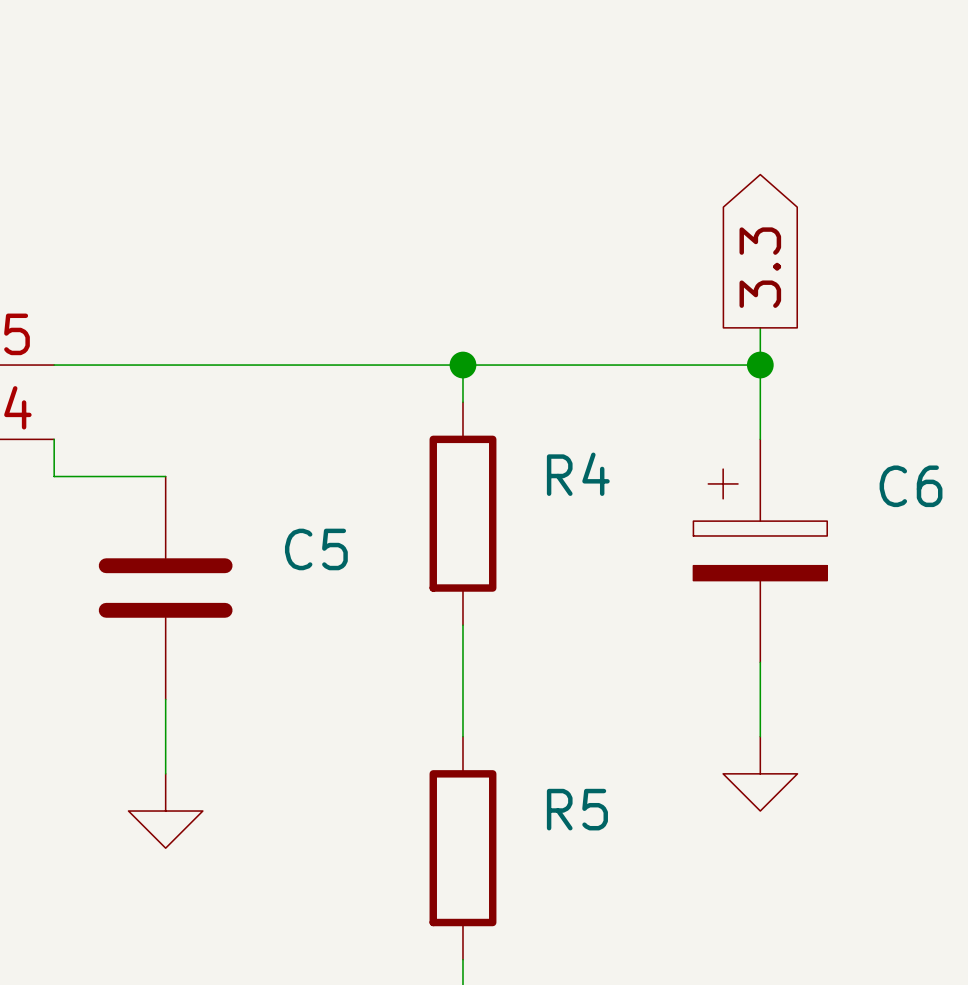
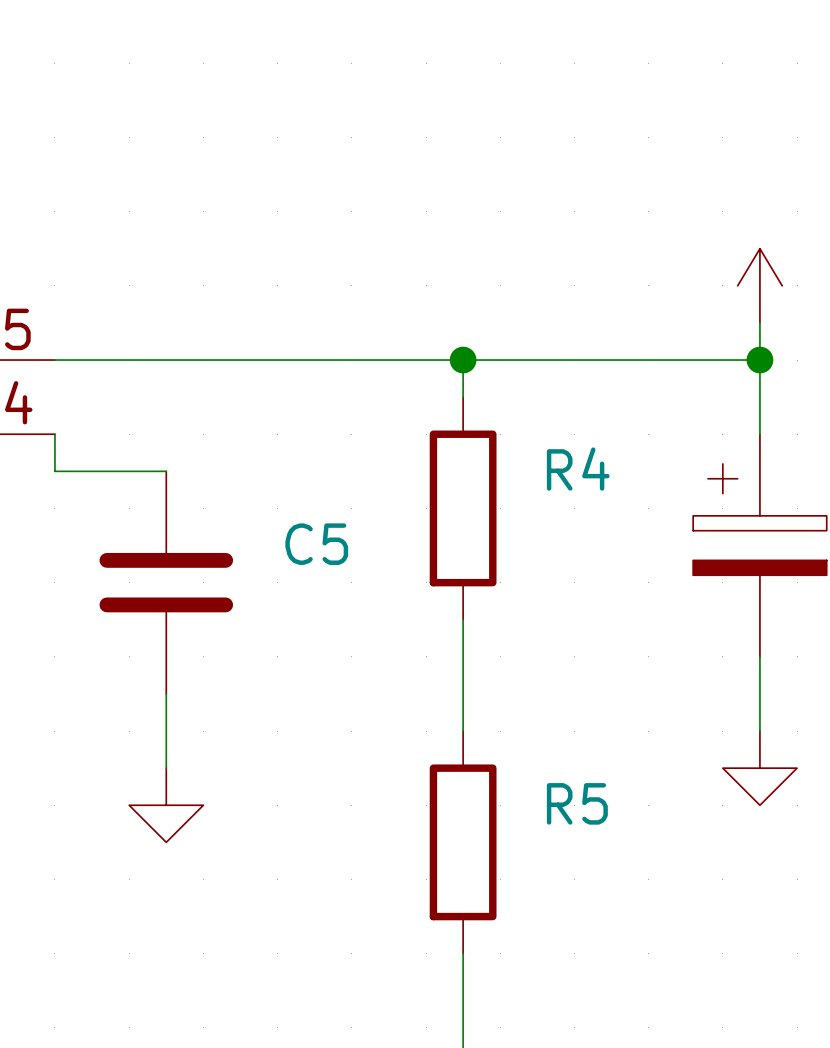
global label: 3.3 (760, 267) -> none
power symbol: none -> (759, 285)

